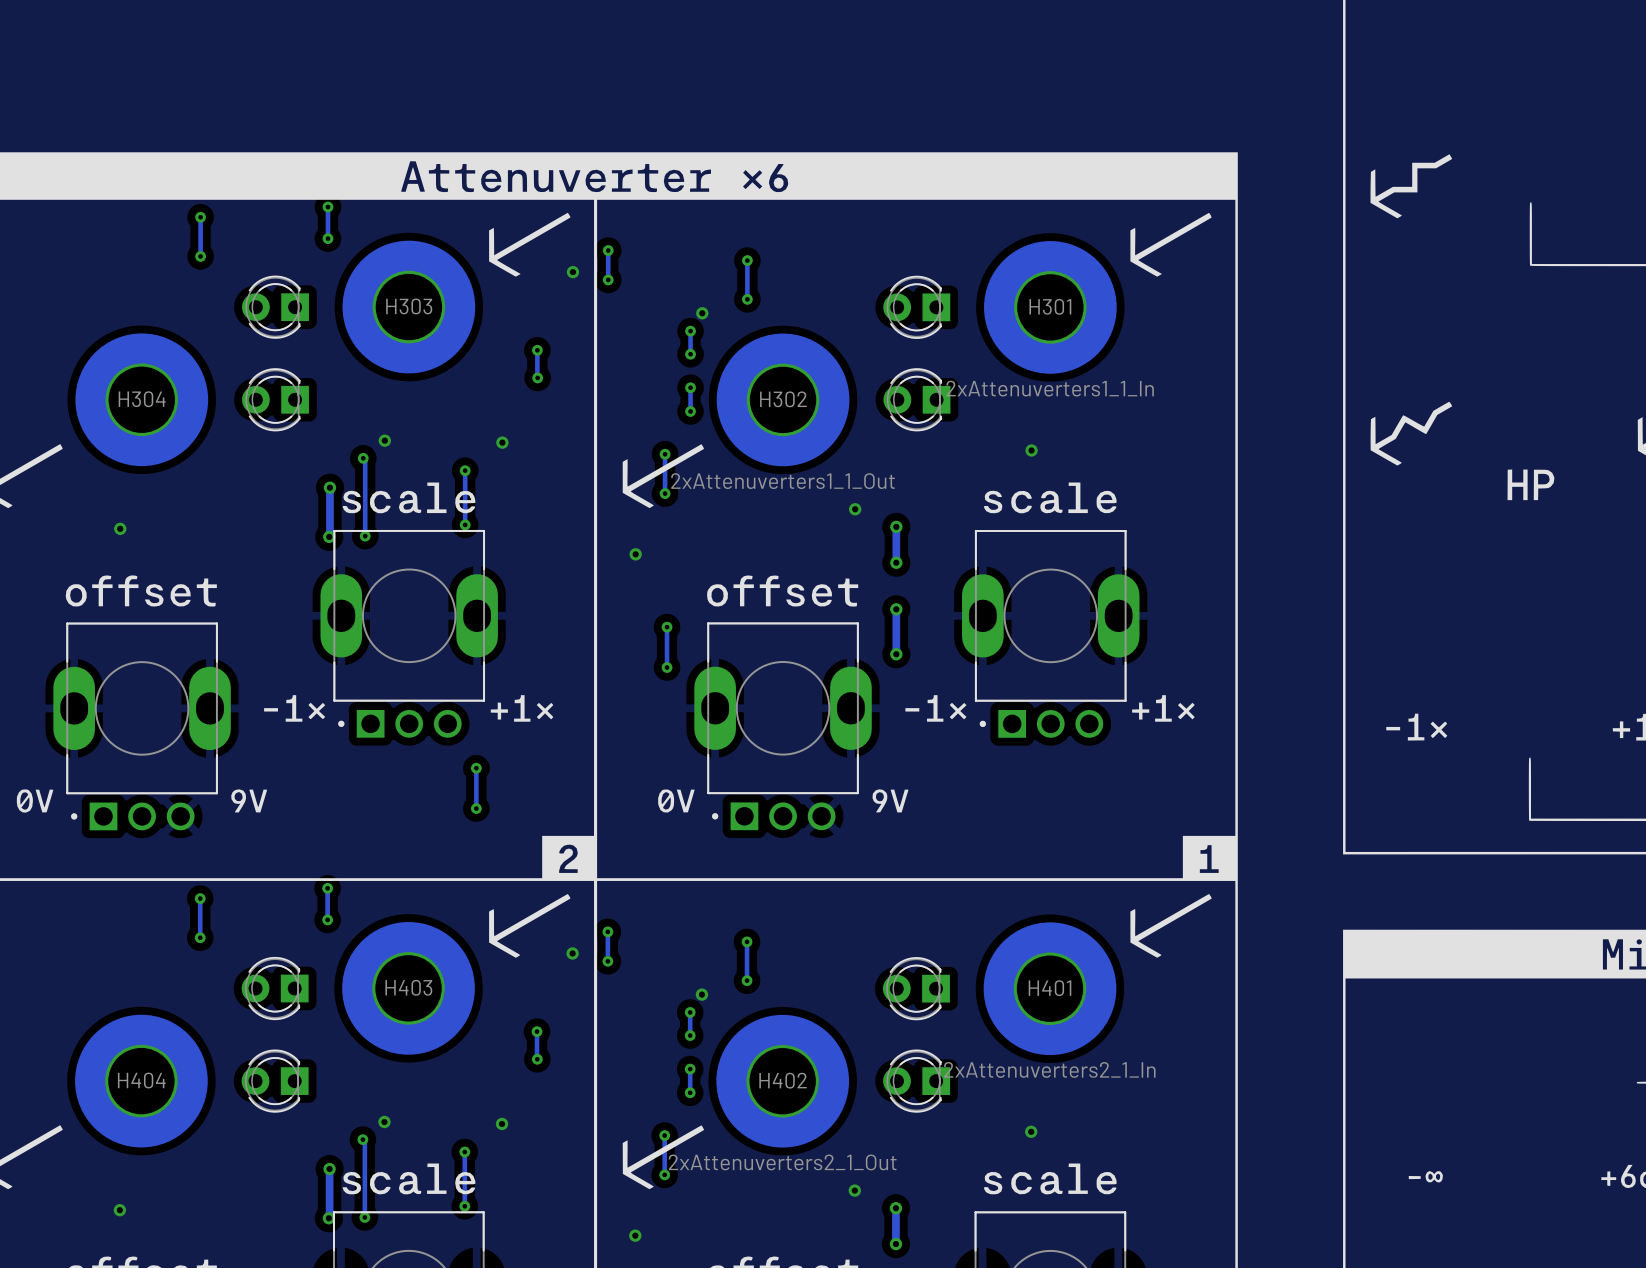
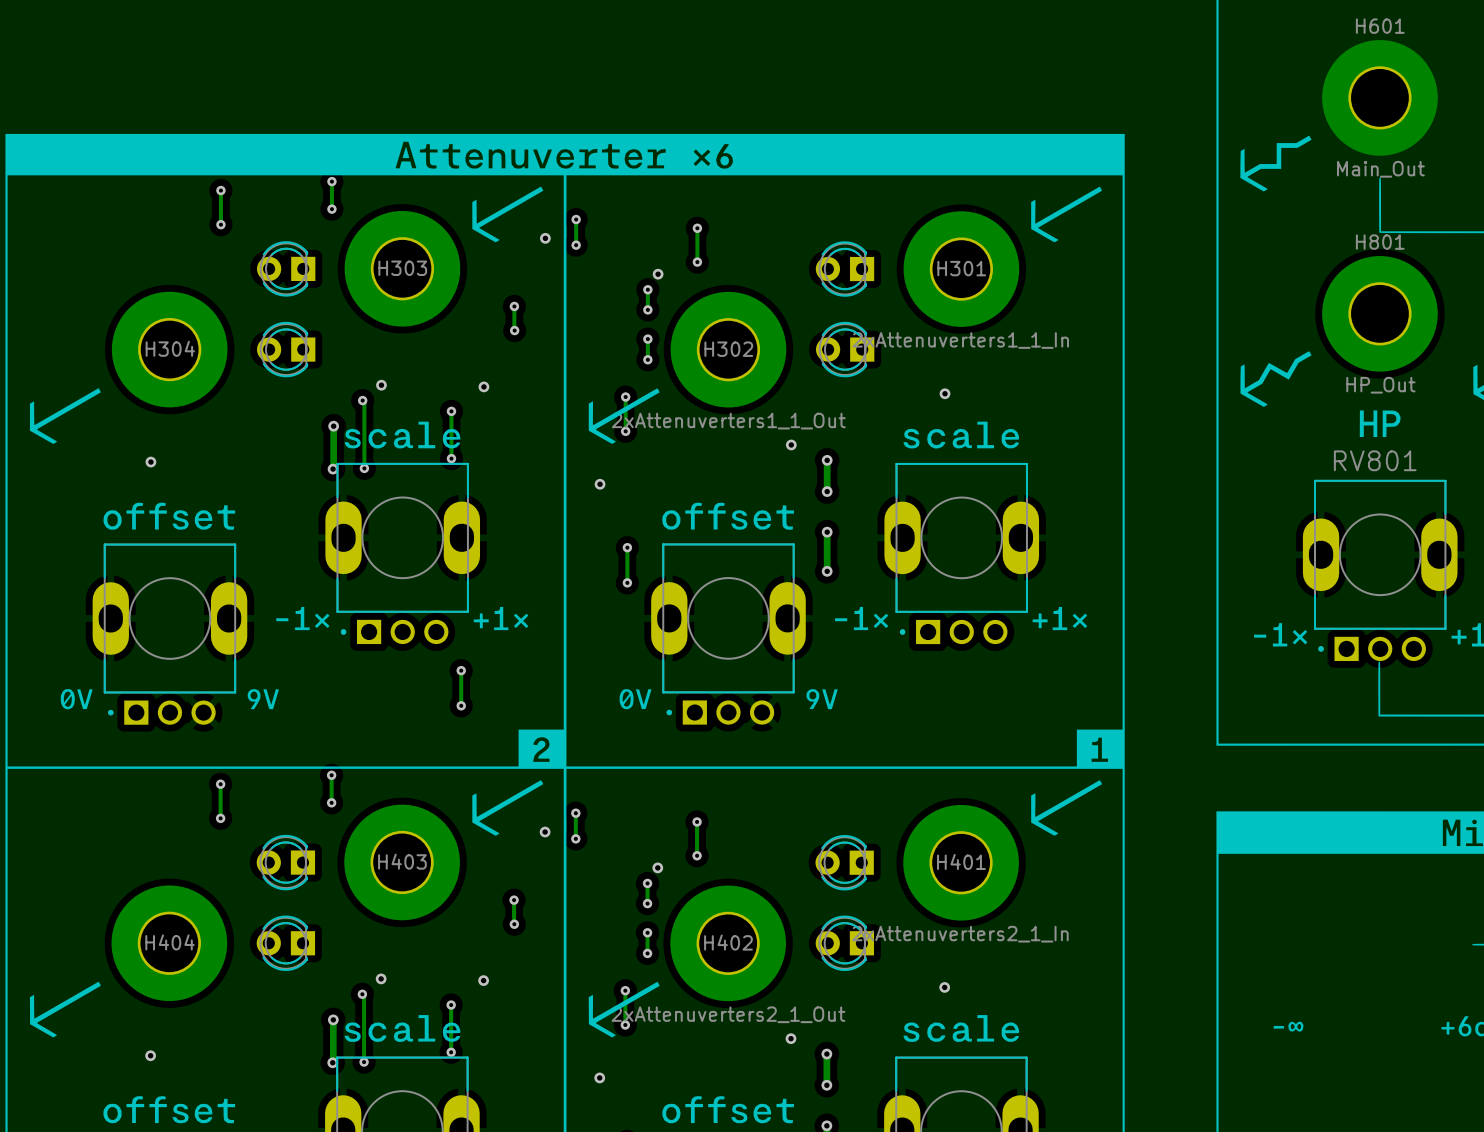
H601: none -> Main_Out (1379, 97)
H801: none -> HP_Out (1379, 313)
RV801: none -> (1380, 570)

